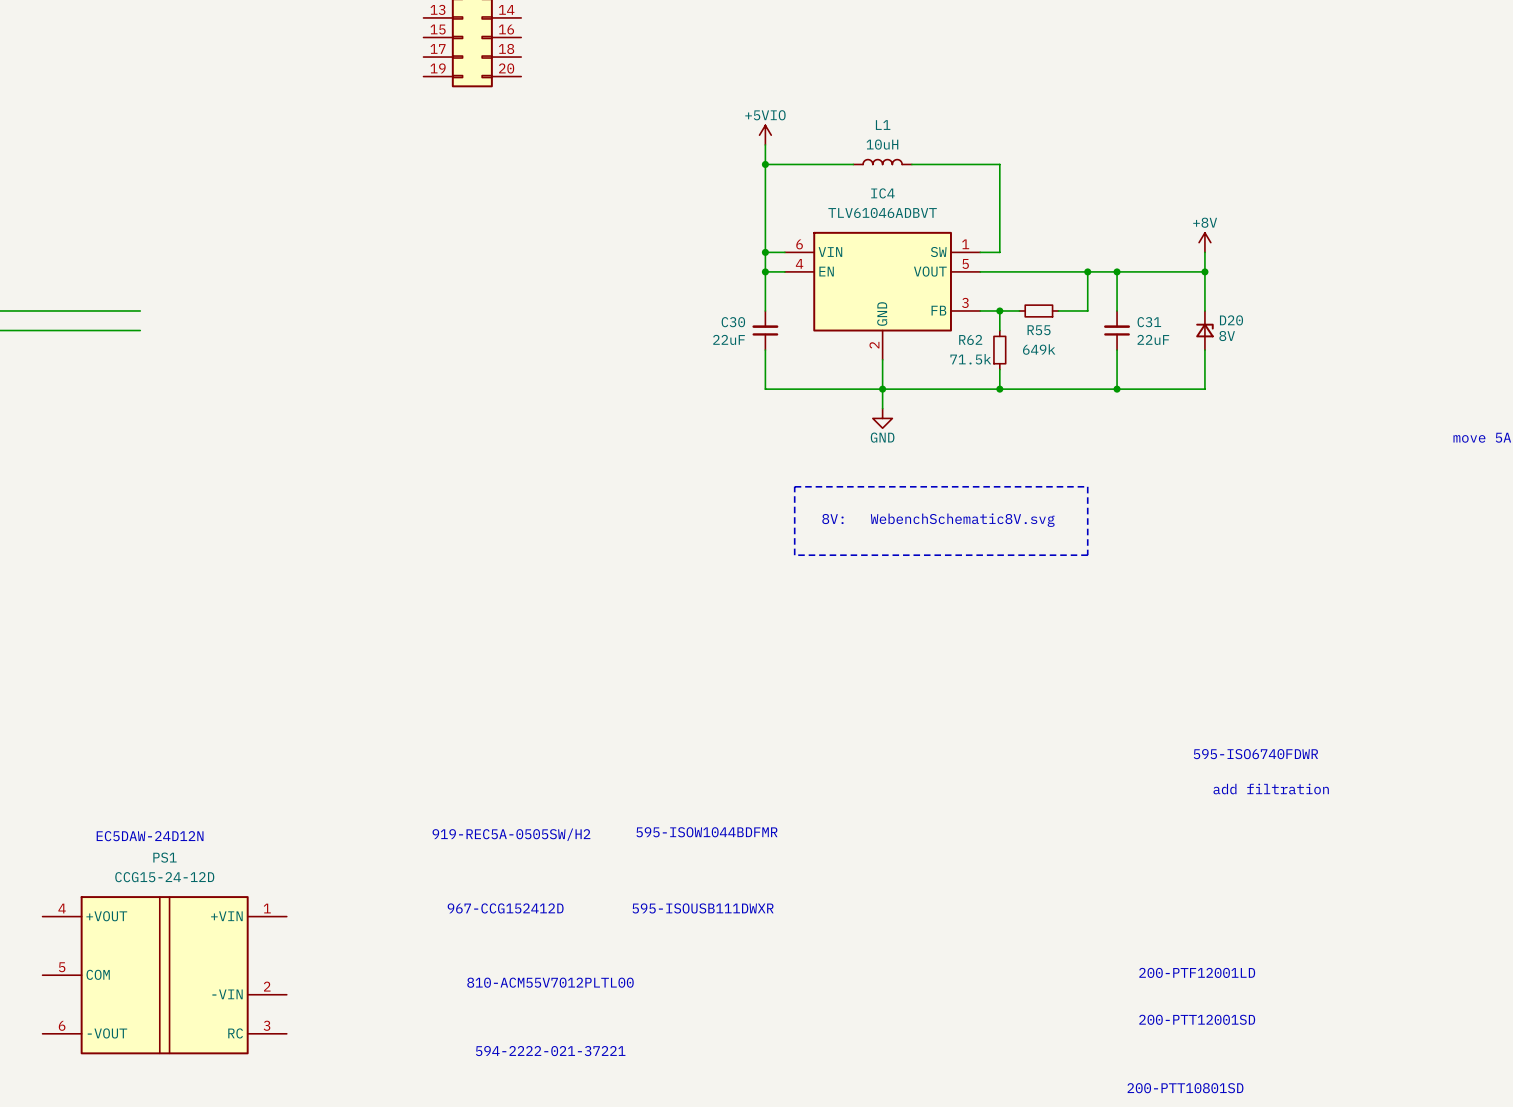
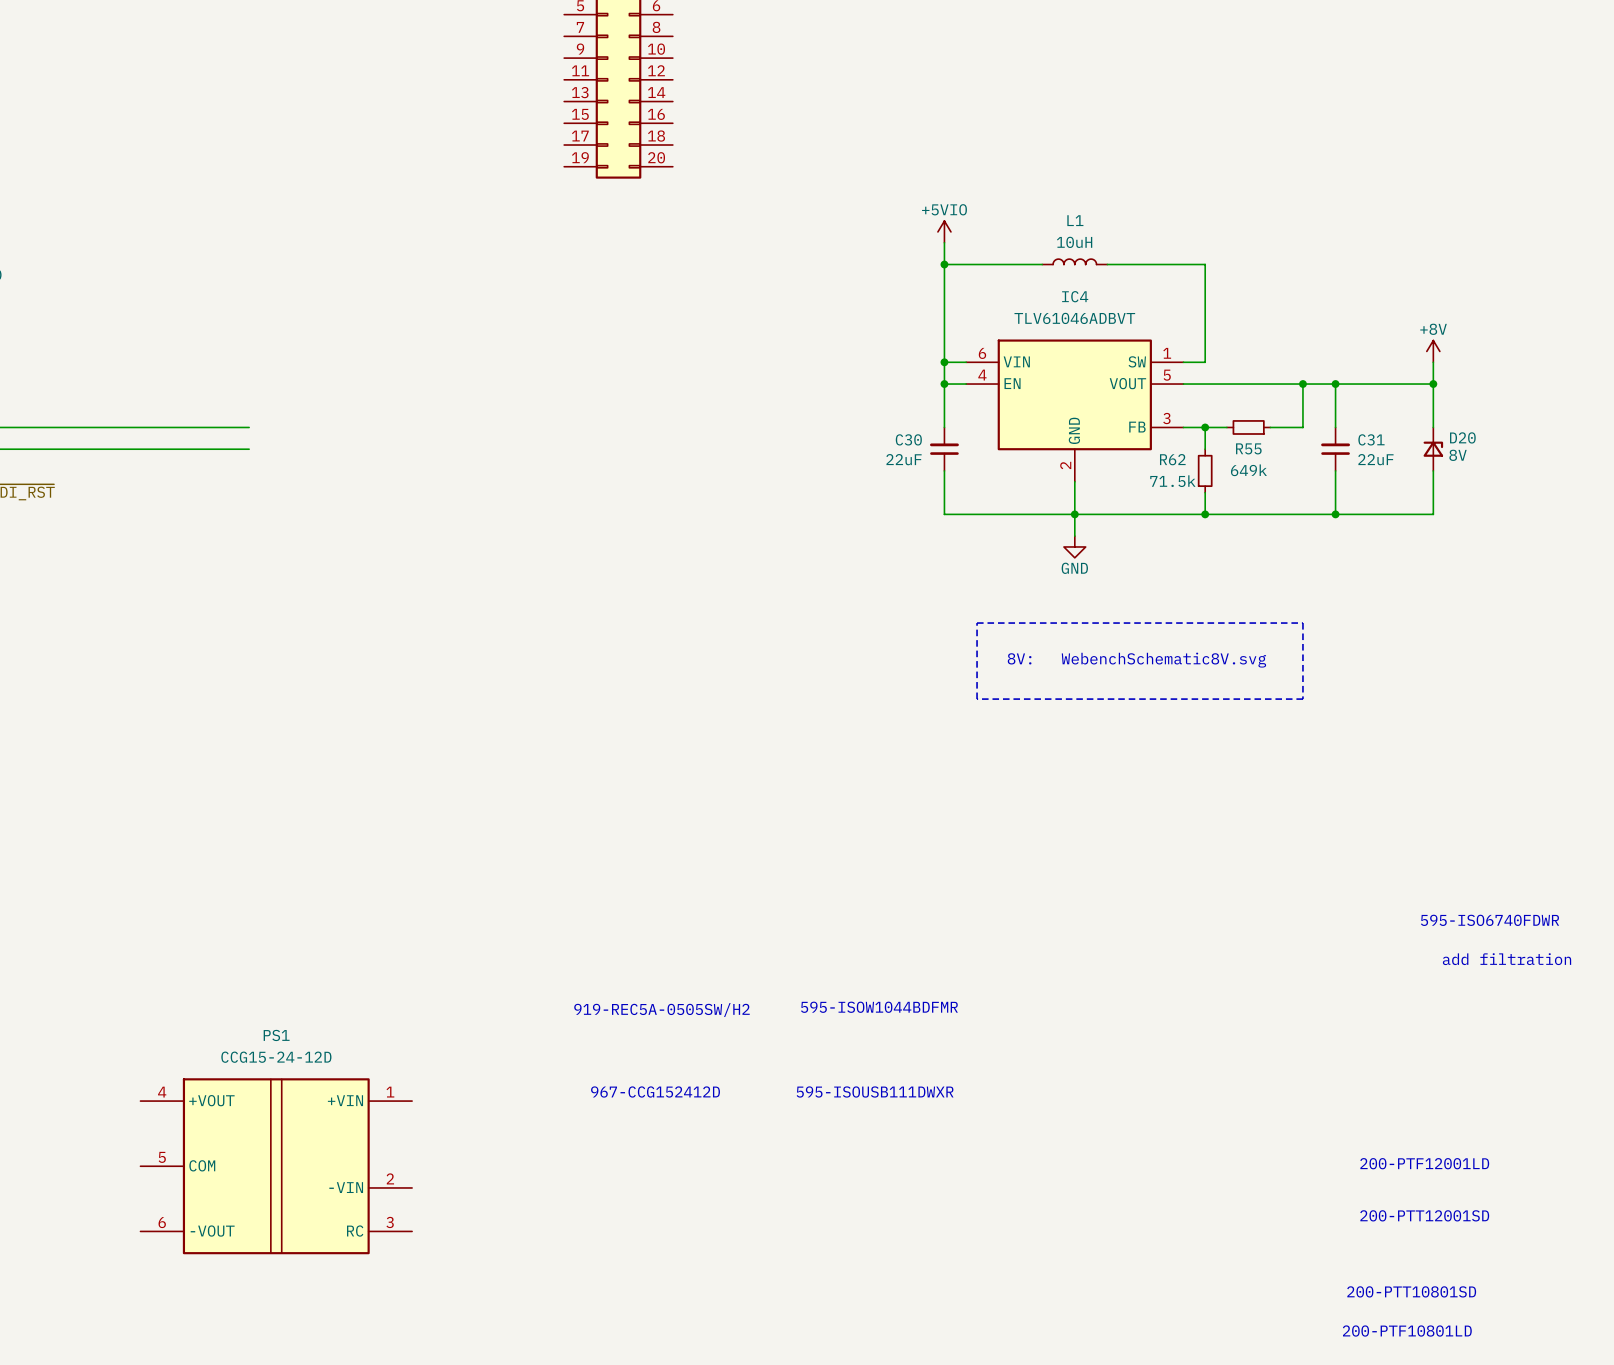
text: EC5DAW-24D12N (150, 836) -> none
text: 810-ACM55V7012PLTL00 (550, 982) -> none
text: 594-2222-021-37221 (550, 1051) -> none

